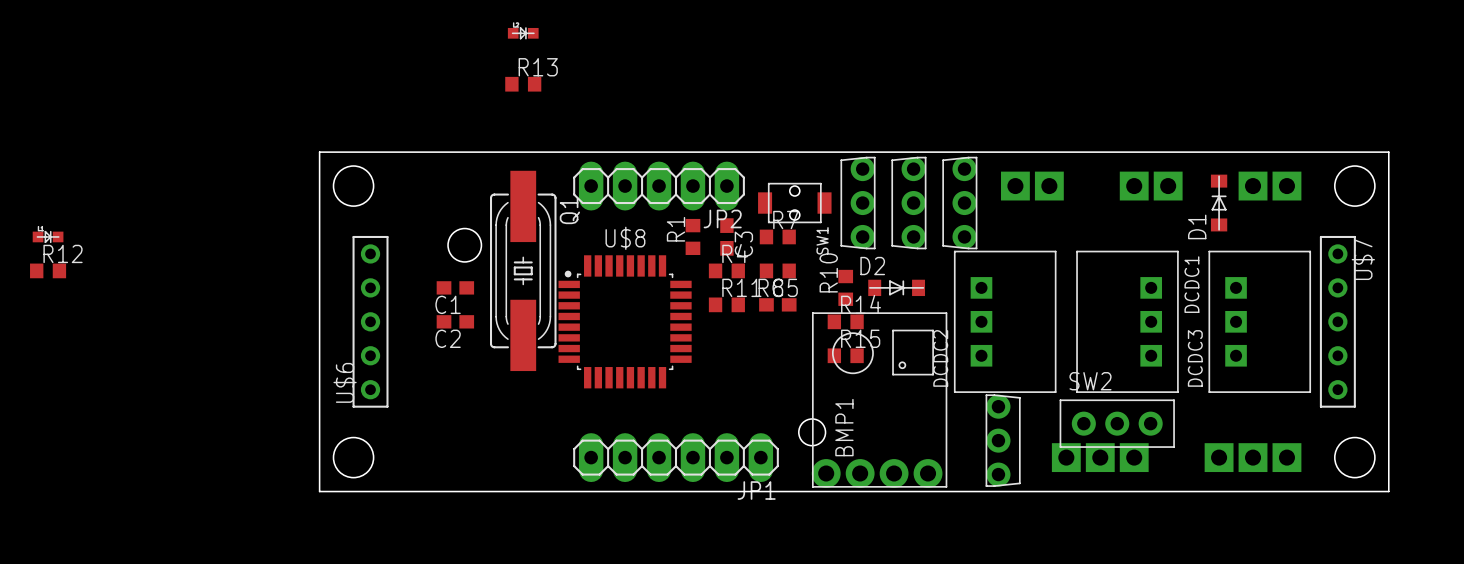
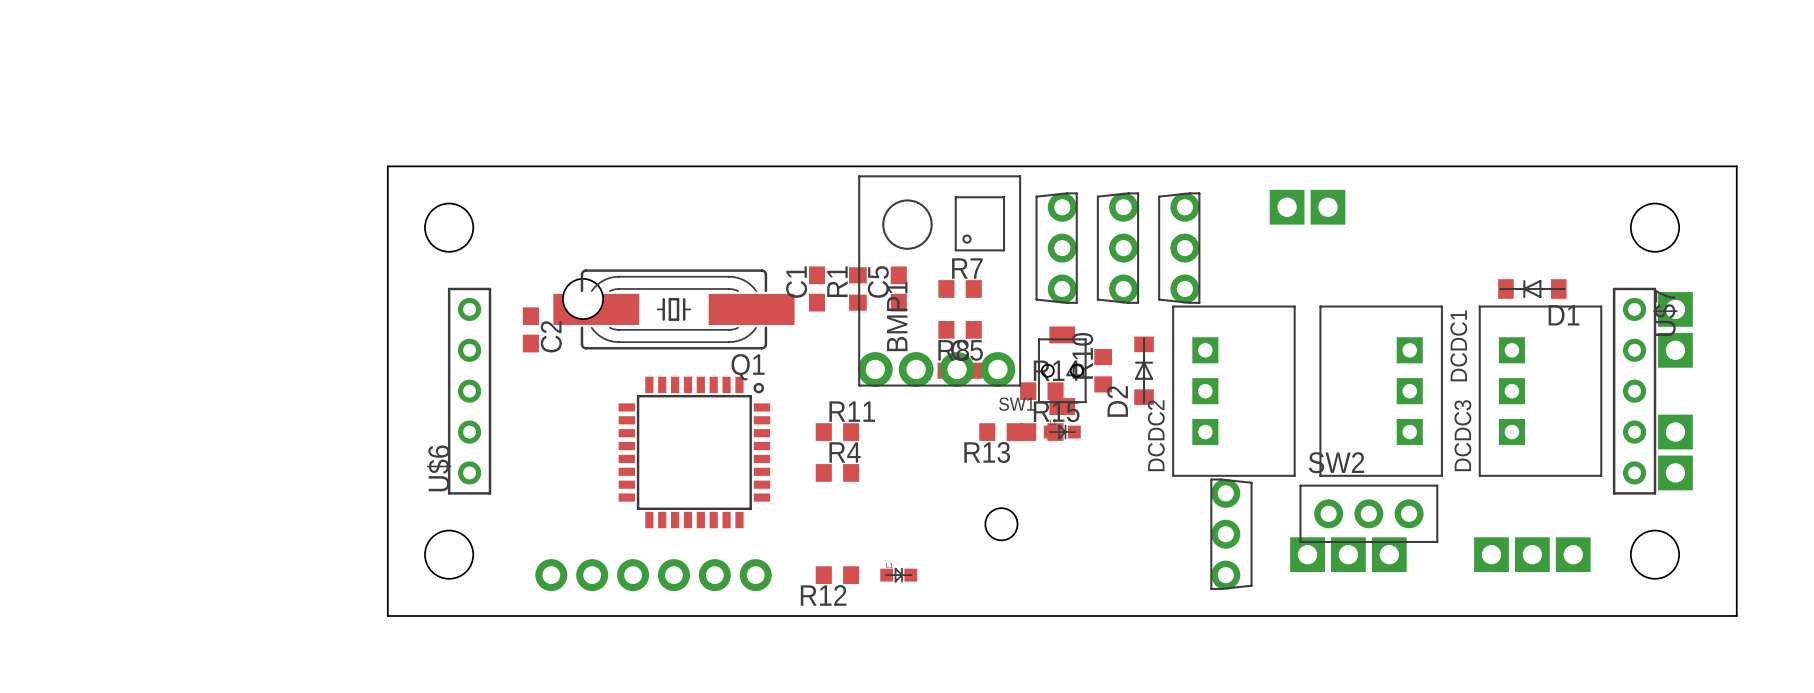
part position: (523, 33) -> (1062, 432)
R13 name position: R13 (538, 67) -> R13 (987, 452)
R13 position: (523, 84) -> (1000, 432)
board edge: (319, 152) (319, 491) (1388, 491) (1388, 152) (319, 152) -> (387, 166) (387, 616) (1736, 616) (1736, 166) (387, 166)
JP2: (659, 186) -> none
part position: (1032, 186) -> (1307, 207)
part: (1151, 186) -> none
part: (1269, 186) -> none
SW1 rotation: 0° (794, 203) -> 90° clockwise (1062, 370)
SW1 position: (794, 203) -> (1062, 370)
D1 rotation: 0° (1219, 203) -> 90° counterclockwise (1532, 288)
D1 position: (1219, 203) -> (1532, 288)
part position: (48, 236) -> (898, 575)
C3 name: C3 (743, 244) -> C5 (878, 281)
R12 name position: R12 (63, 253) -> R12 (823, 595)
R12 position: (48, 270) -> (837, 575)
Q1 rotation: 0° (523, 270) -> 90° clockwise (673, 309)
R4 position: (726, 270) -> (837, 472)
part: none -> (1675, 329)
C1 rotation: 0° (455, 287) -> 90° clockwise (817, 288)
C1 position: (455, 287) -> (817, 288)
R10 position: (845, 287) -> (1103, 370)
D2 rotation: 0° (896, 287) -> 90° counterclockwise (1144, 370)
D2 position: (896, 287) -> (1144, 370)
R11 position: (726, 304) -> (837, 432)
C2 rotation: 0° (455, 321) -> 90° clockwise (530, 329)
C2 position: (455, 321) -> (530, 329)
U$8: (625, 321) -> none
C2 name position: C2 (448, 338) -> C2 (551, 336)
part: none -> (694, 452)
part: none -> (1675, 452)
BMP1 position: (879, 400) -> (939, 281)
JP1: (676, 457) -> none
part: none -> (653, 575)

